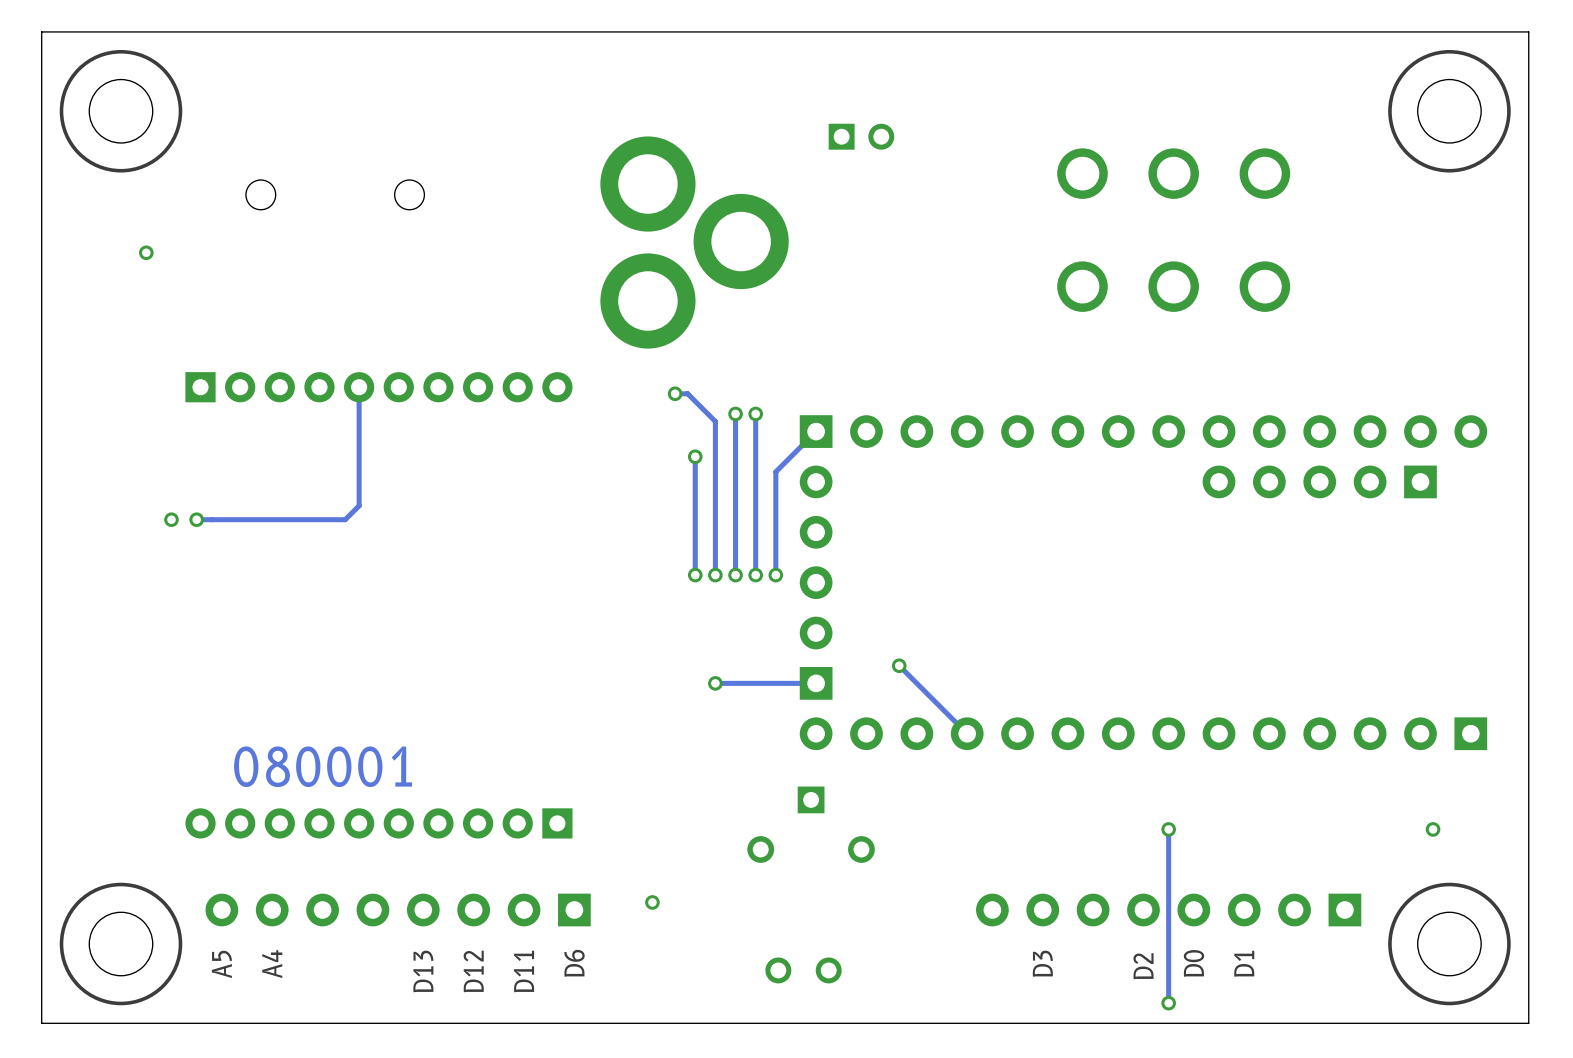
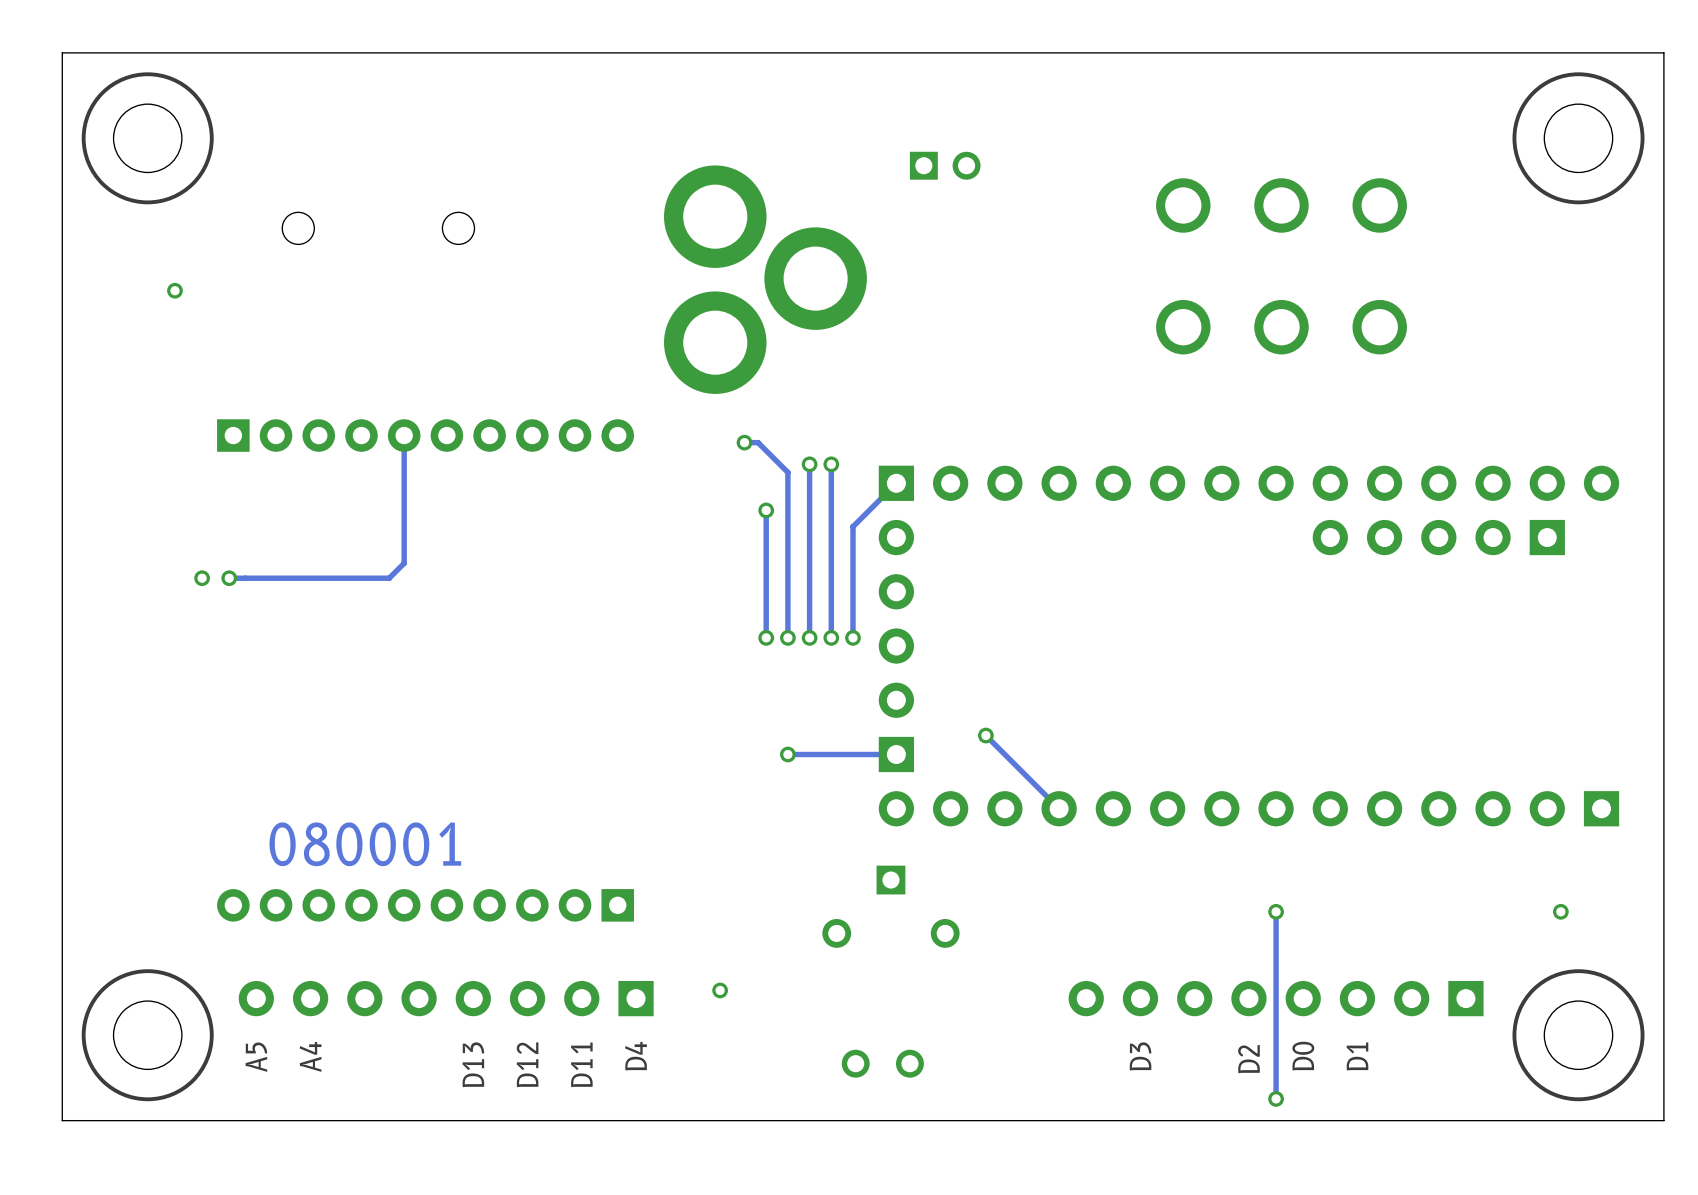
text: D6 (574, 963) -> D4 (636, 1056)

